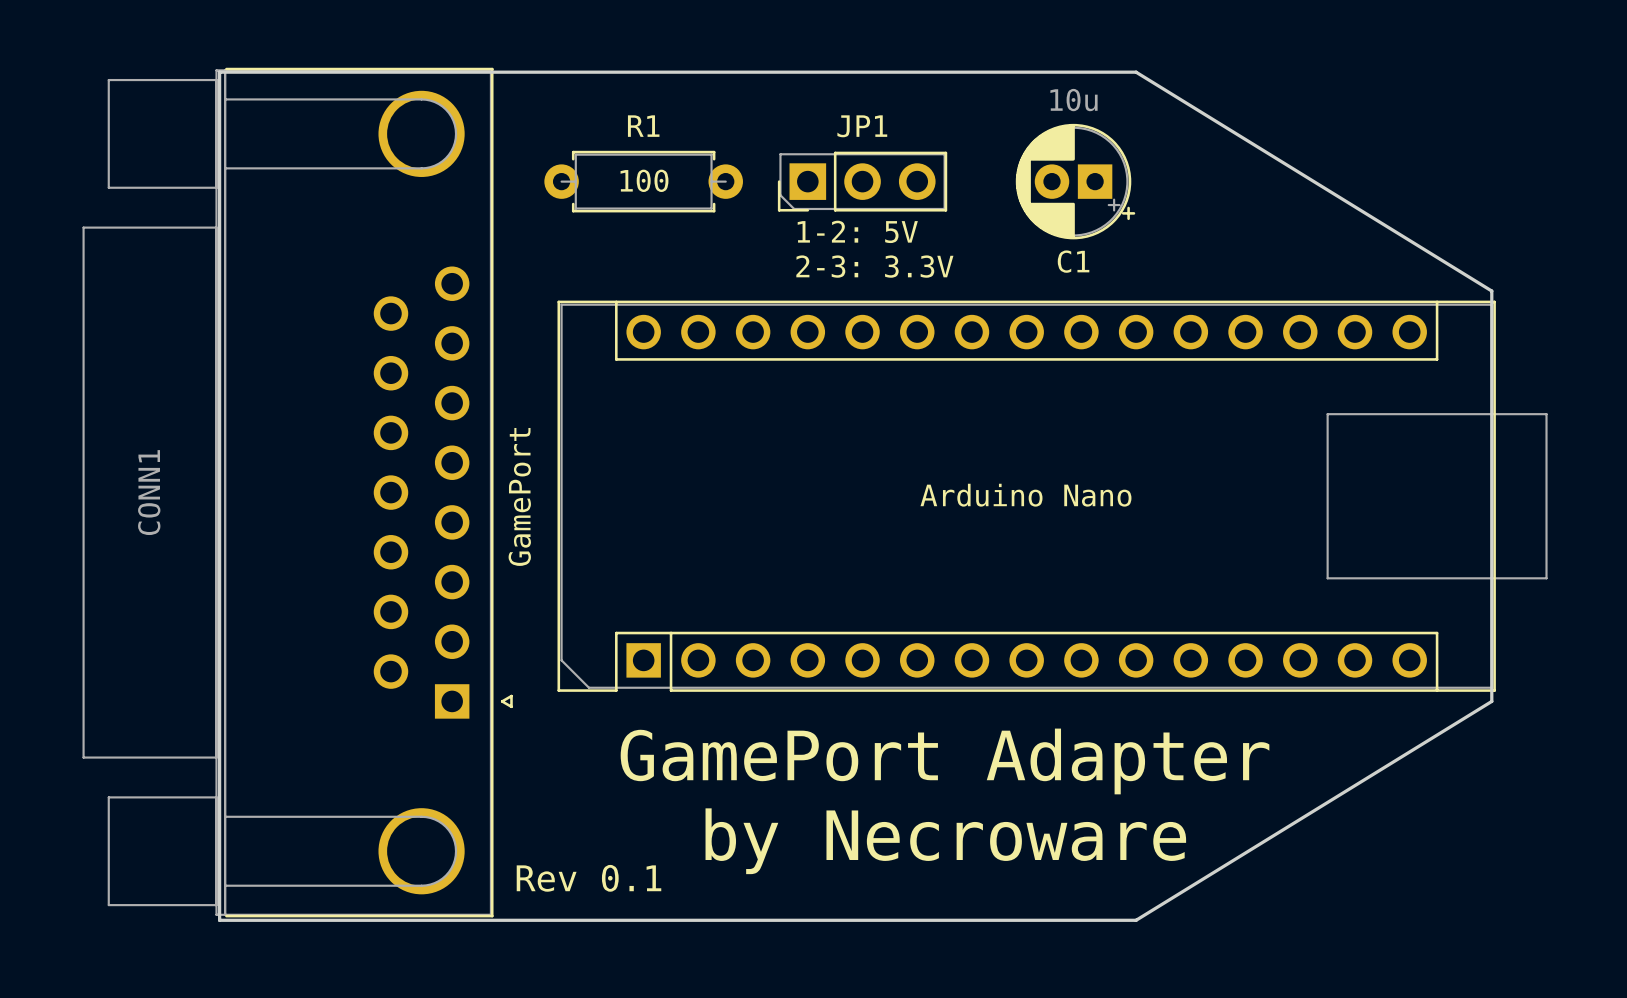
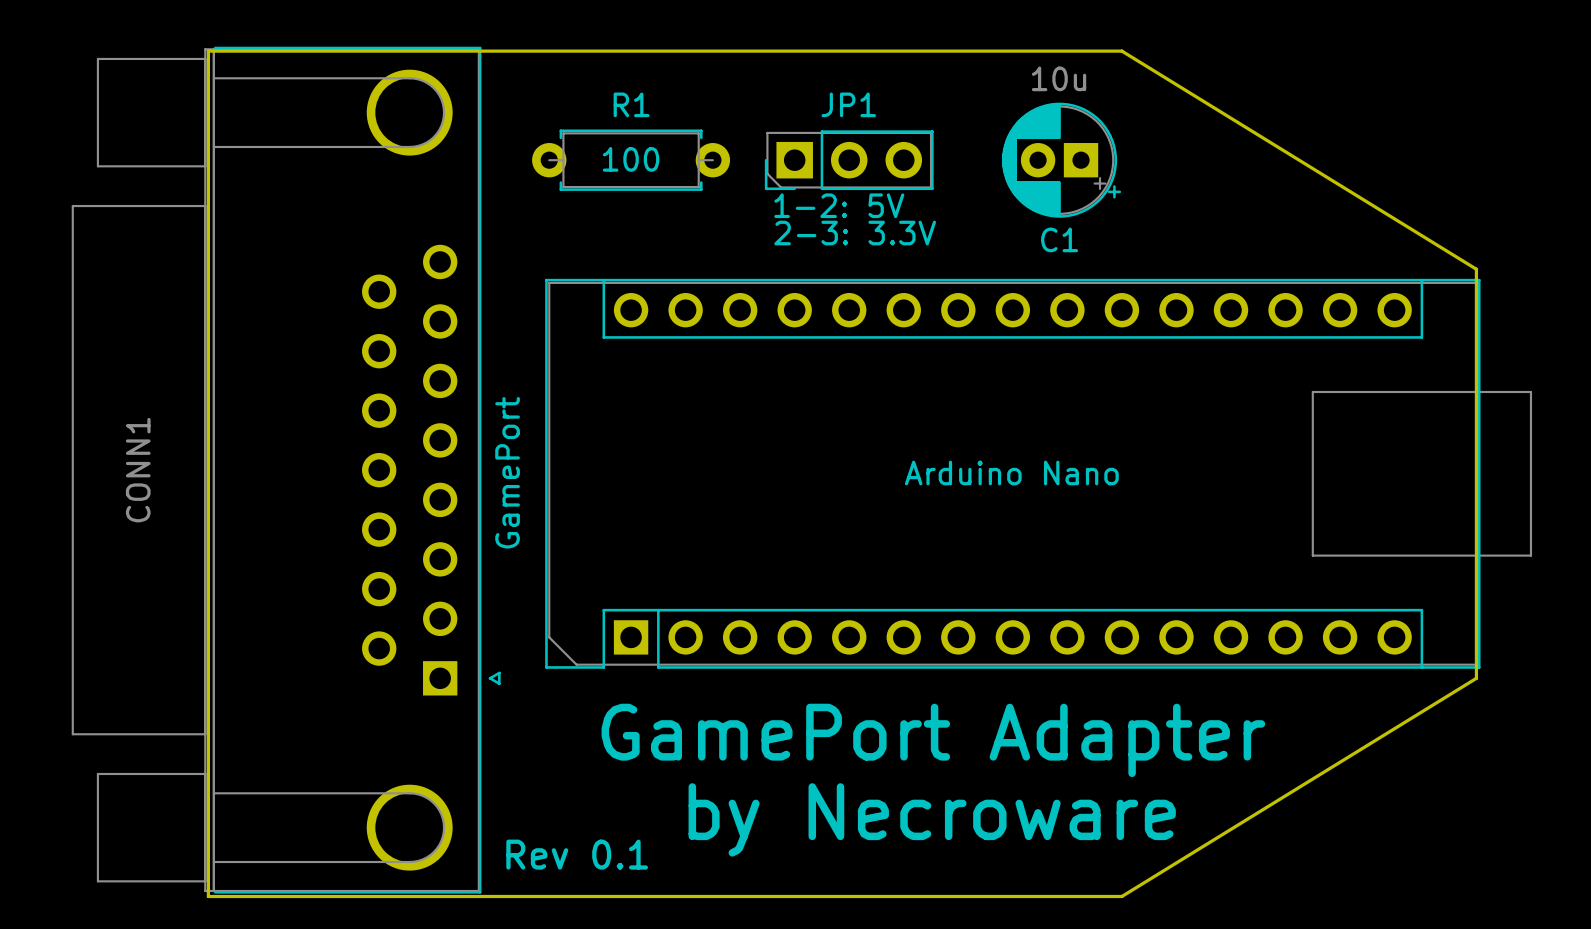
JP1 text: none -> 1-2: 5V (839, 205)
text: 1-2: 5V (857, 231) -> none
JP1 text: none -> 2-3: 3.3V (855, 233)
text: 2-3: 3.3V (874, 266) -> none

